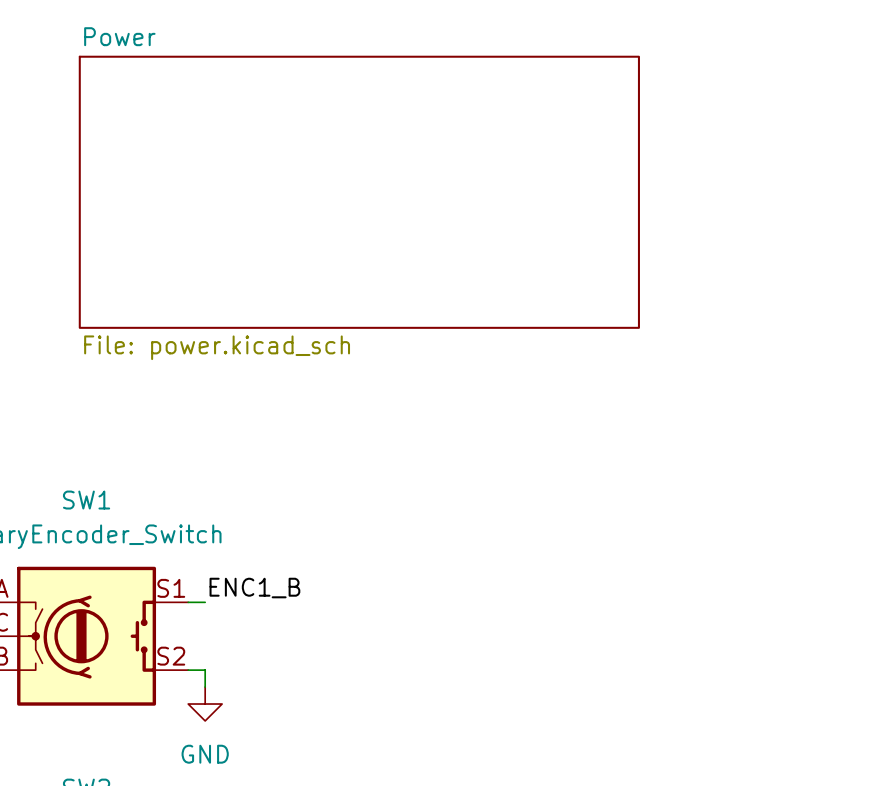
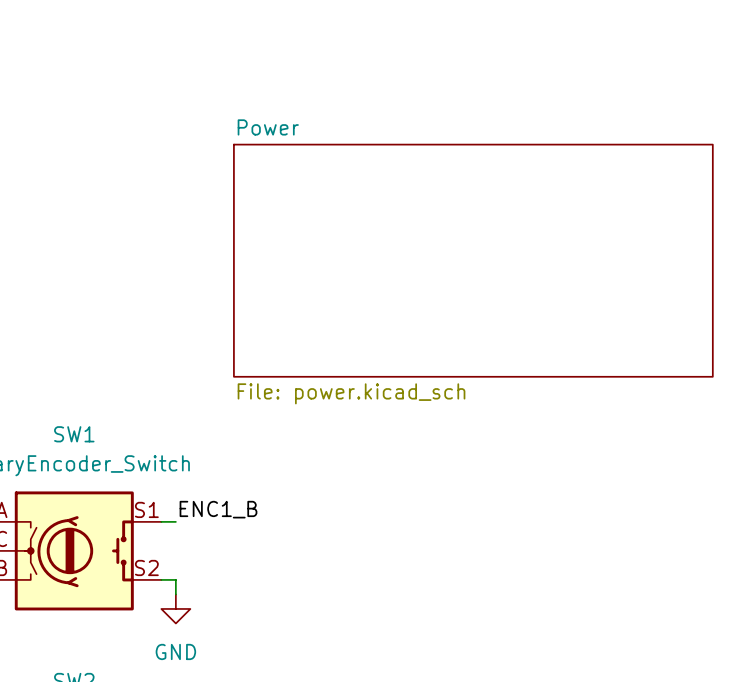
sheet Power position: (359, 192) -> (473, 260)

